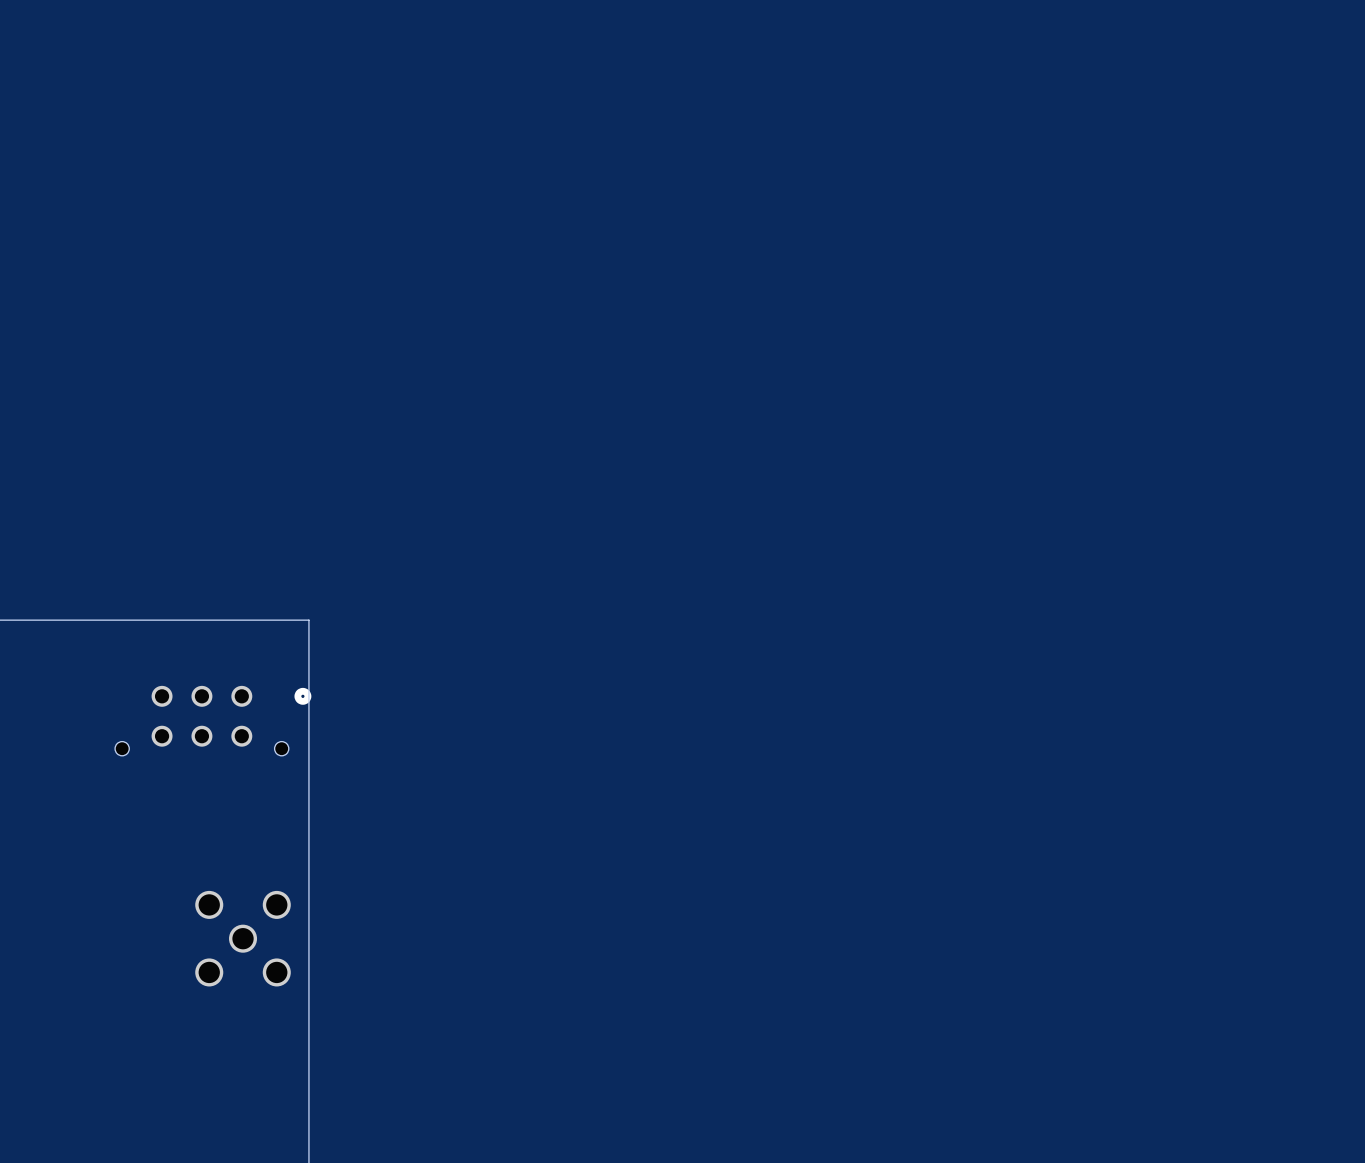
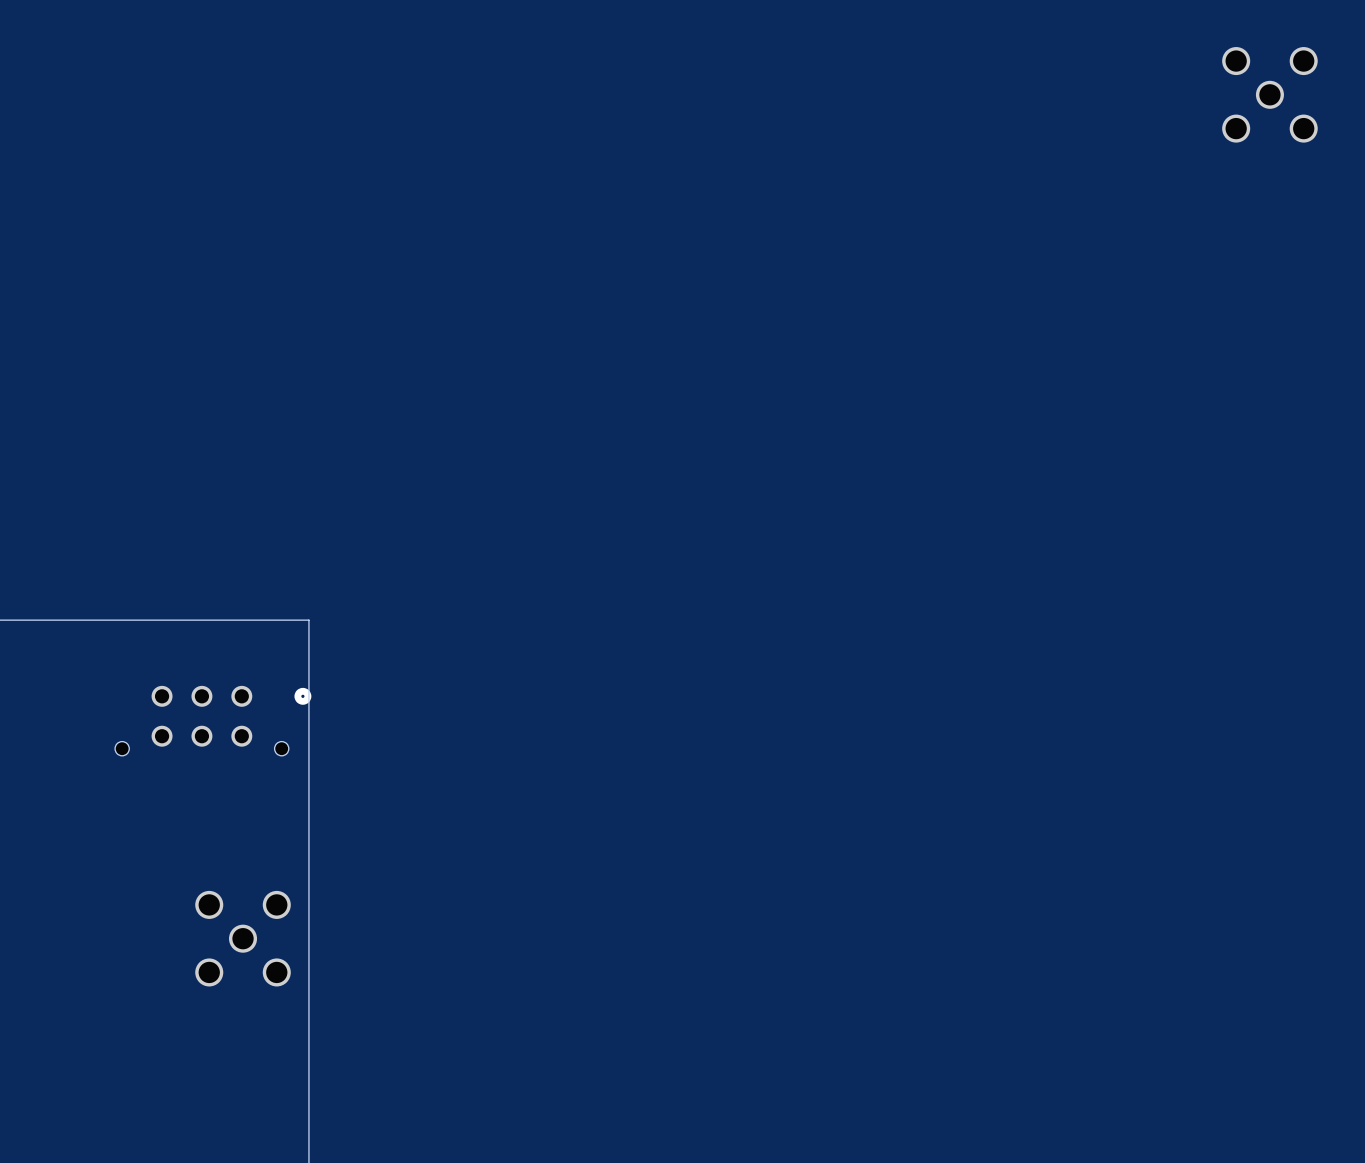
part: none -> (1269, 94)

